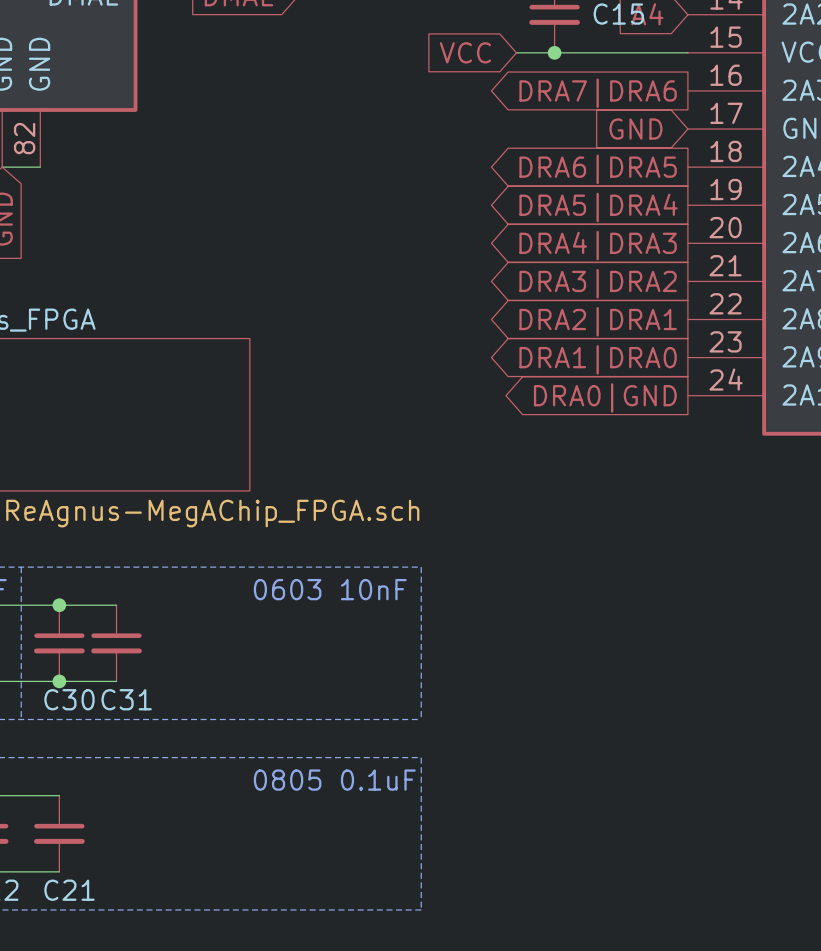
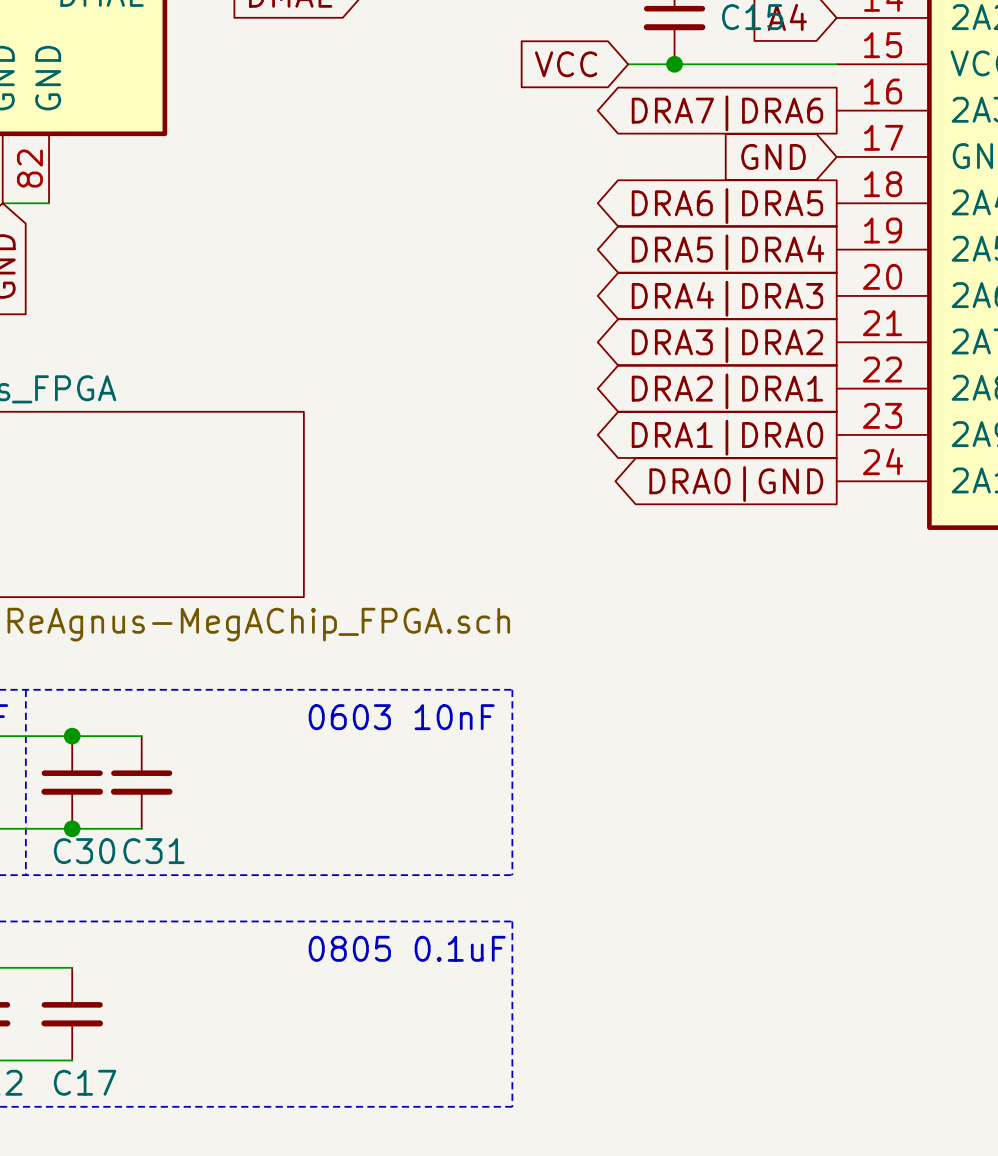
C21 name: C21 (69, 890) -> C17 (85, 1082)

